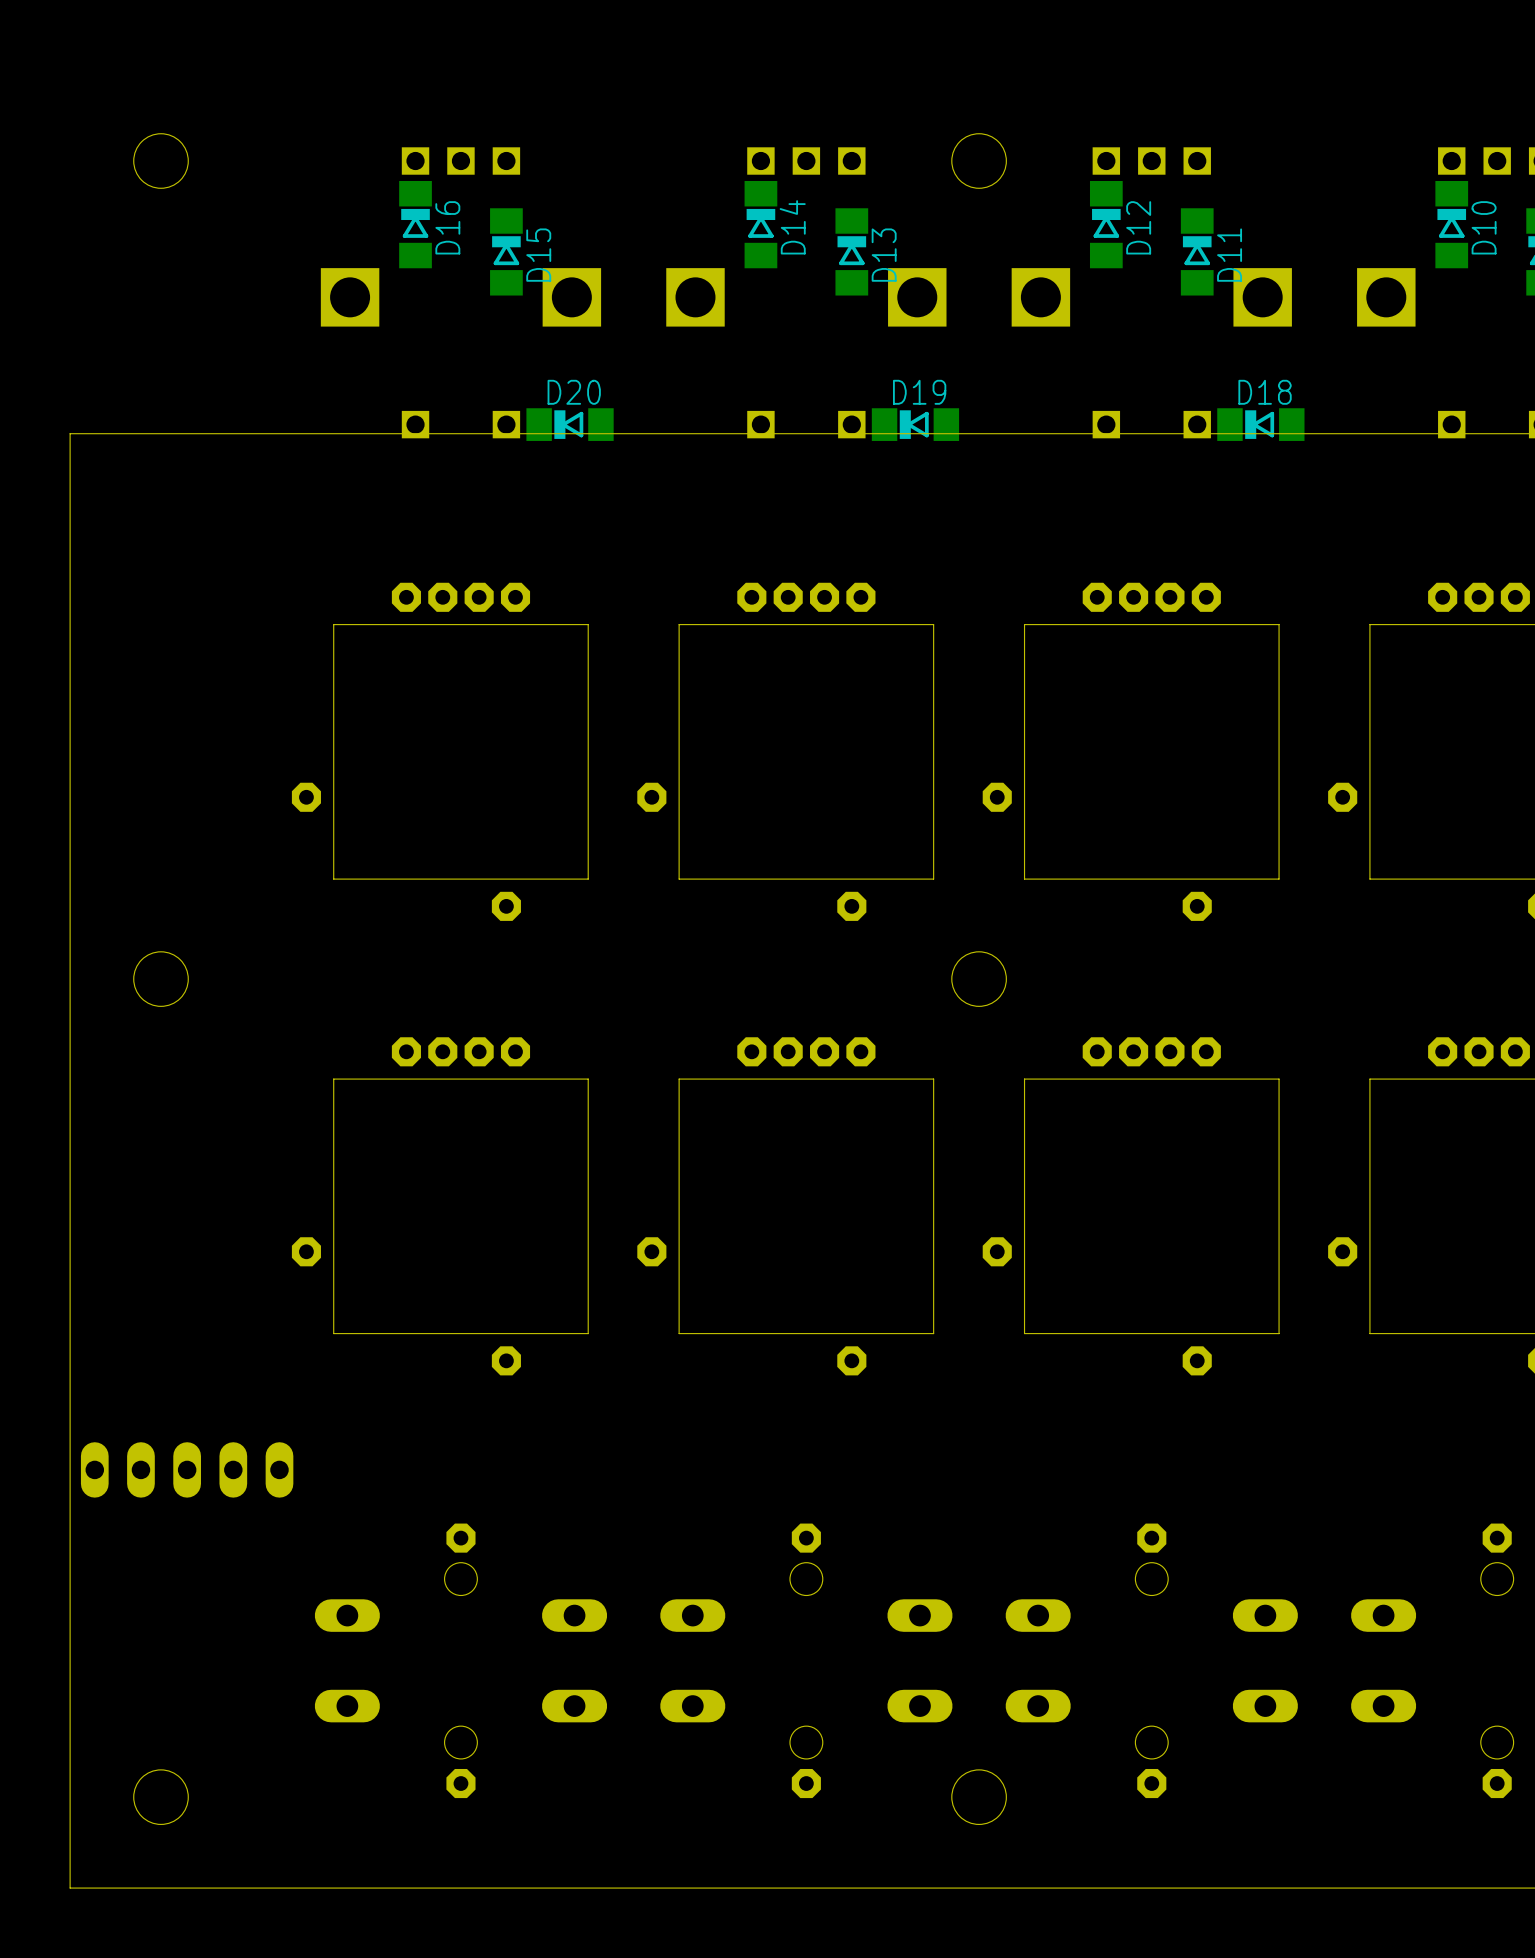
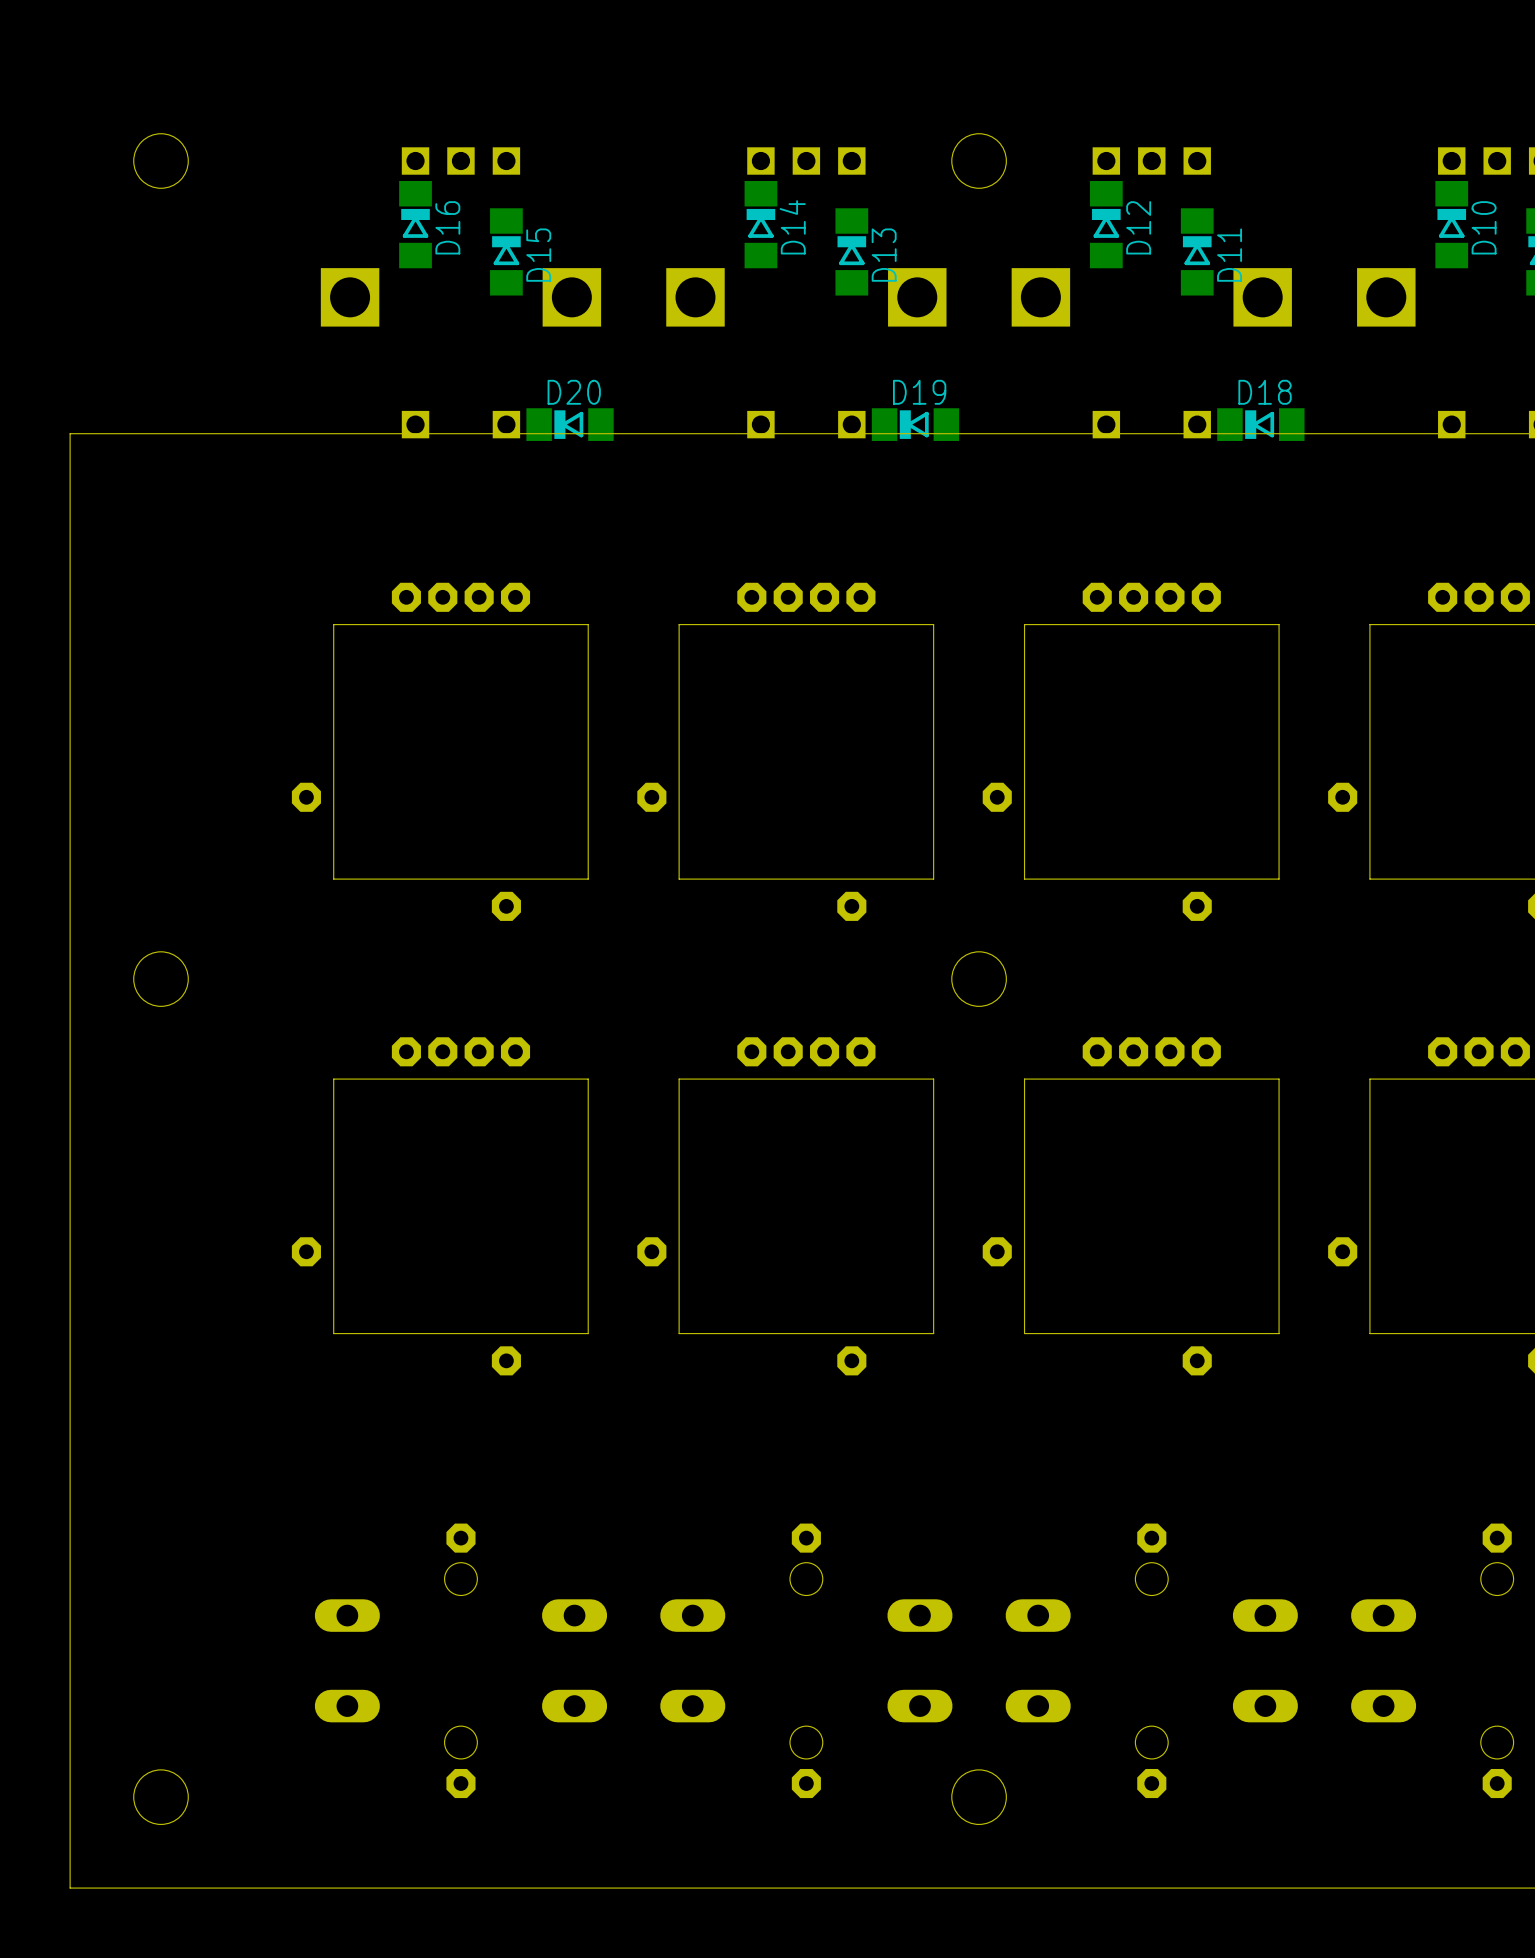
part: (187, 1469) -> none

